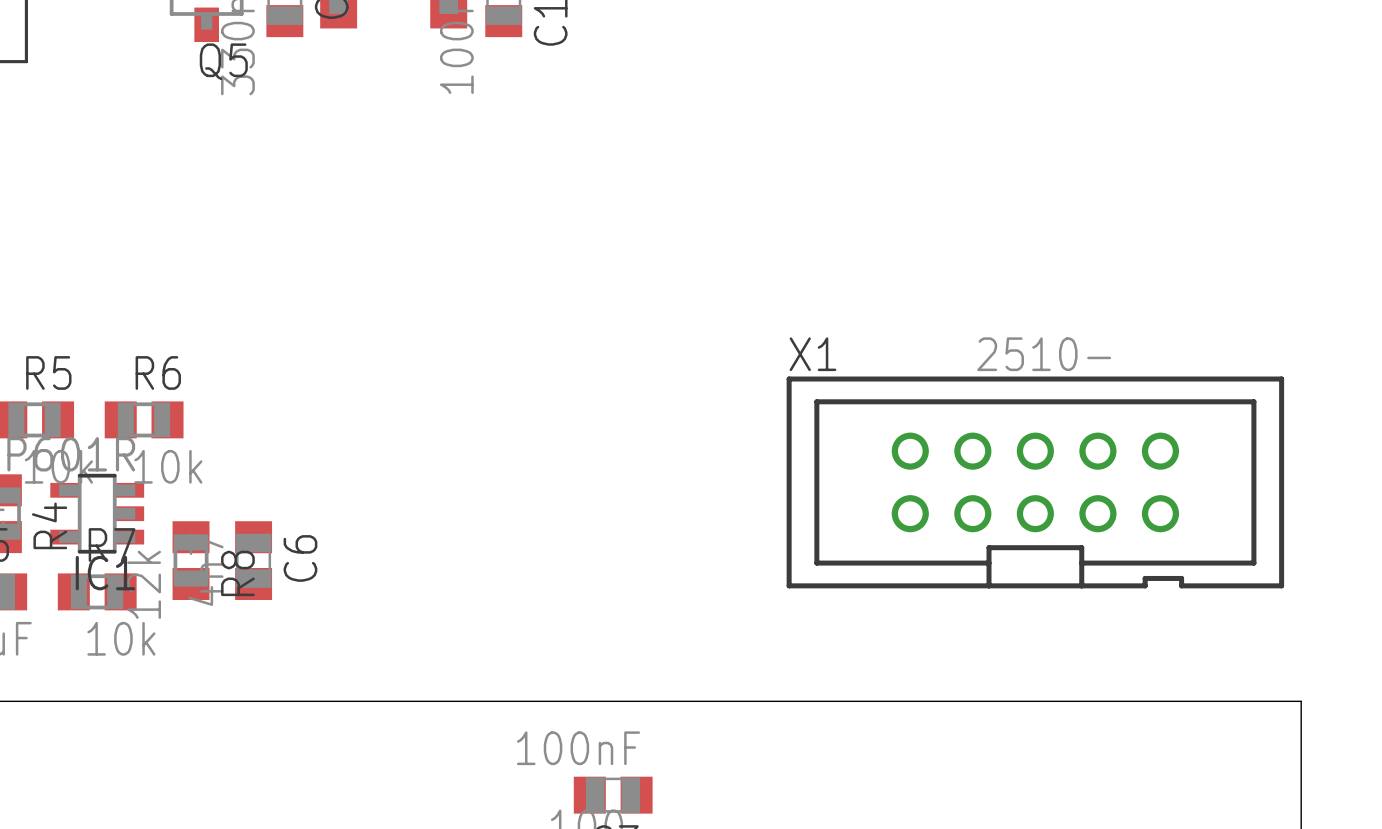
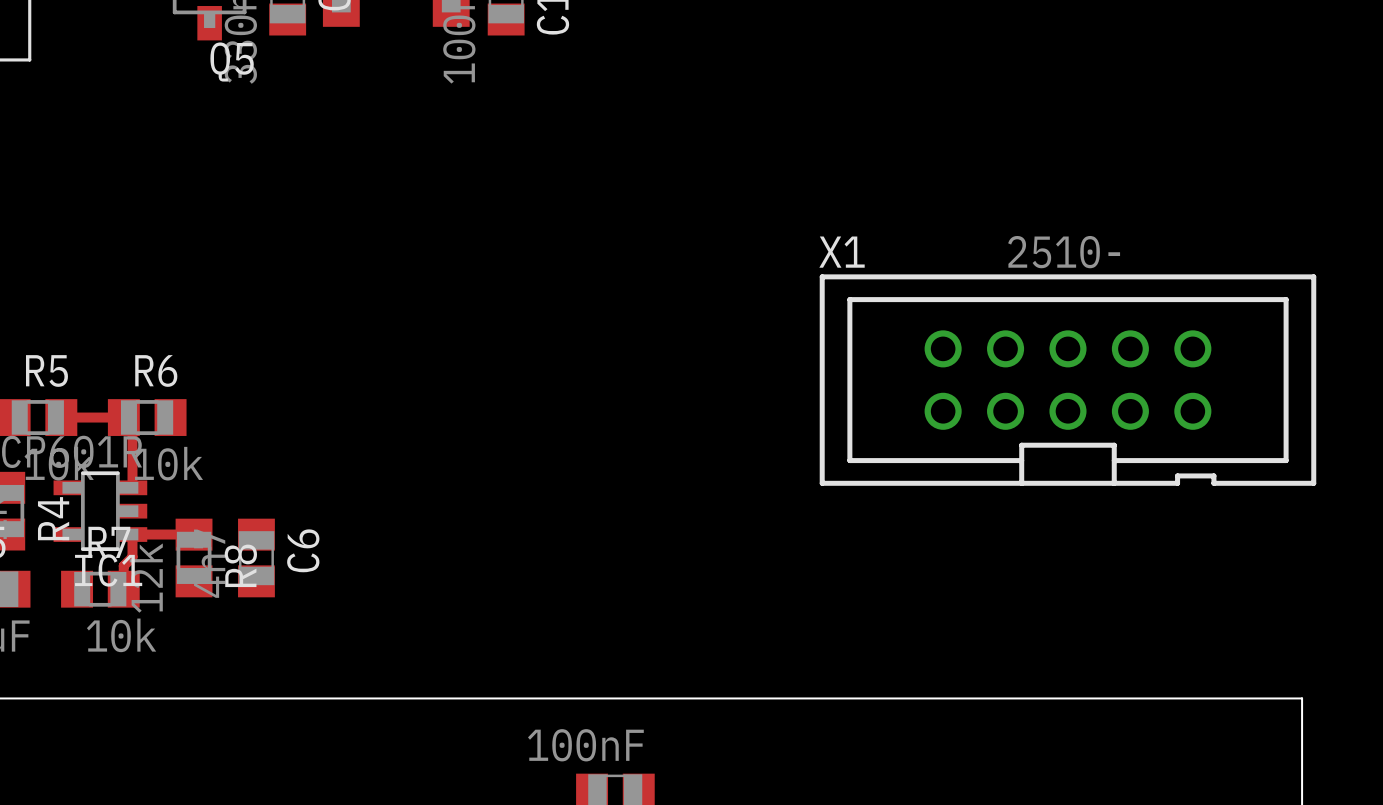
top track: none -> (61, 417) (123, 417) (132, 426) (132, 487)
X1 position: (1035, 482) -> (1067, 380)
top track: none -> (193, 534) (132, 534) (132, 557) (123, 565) (123, 589)

